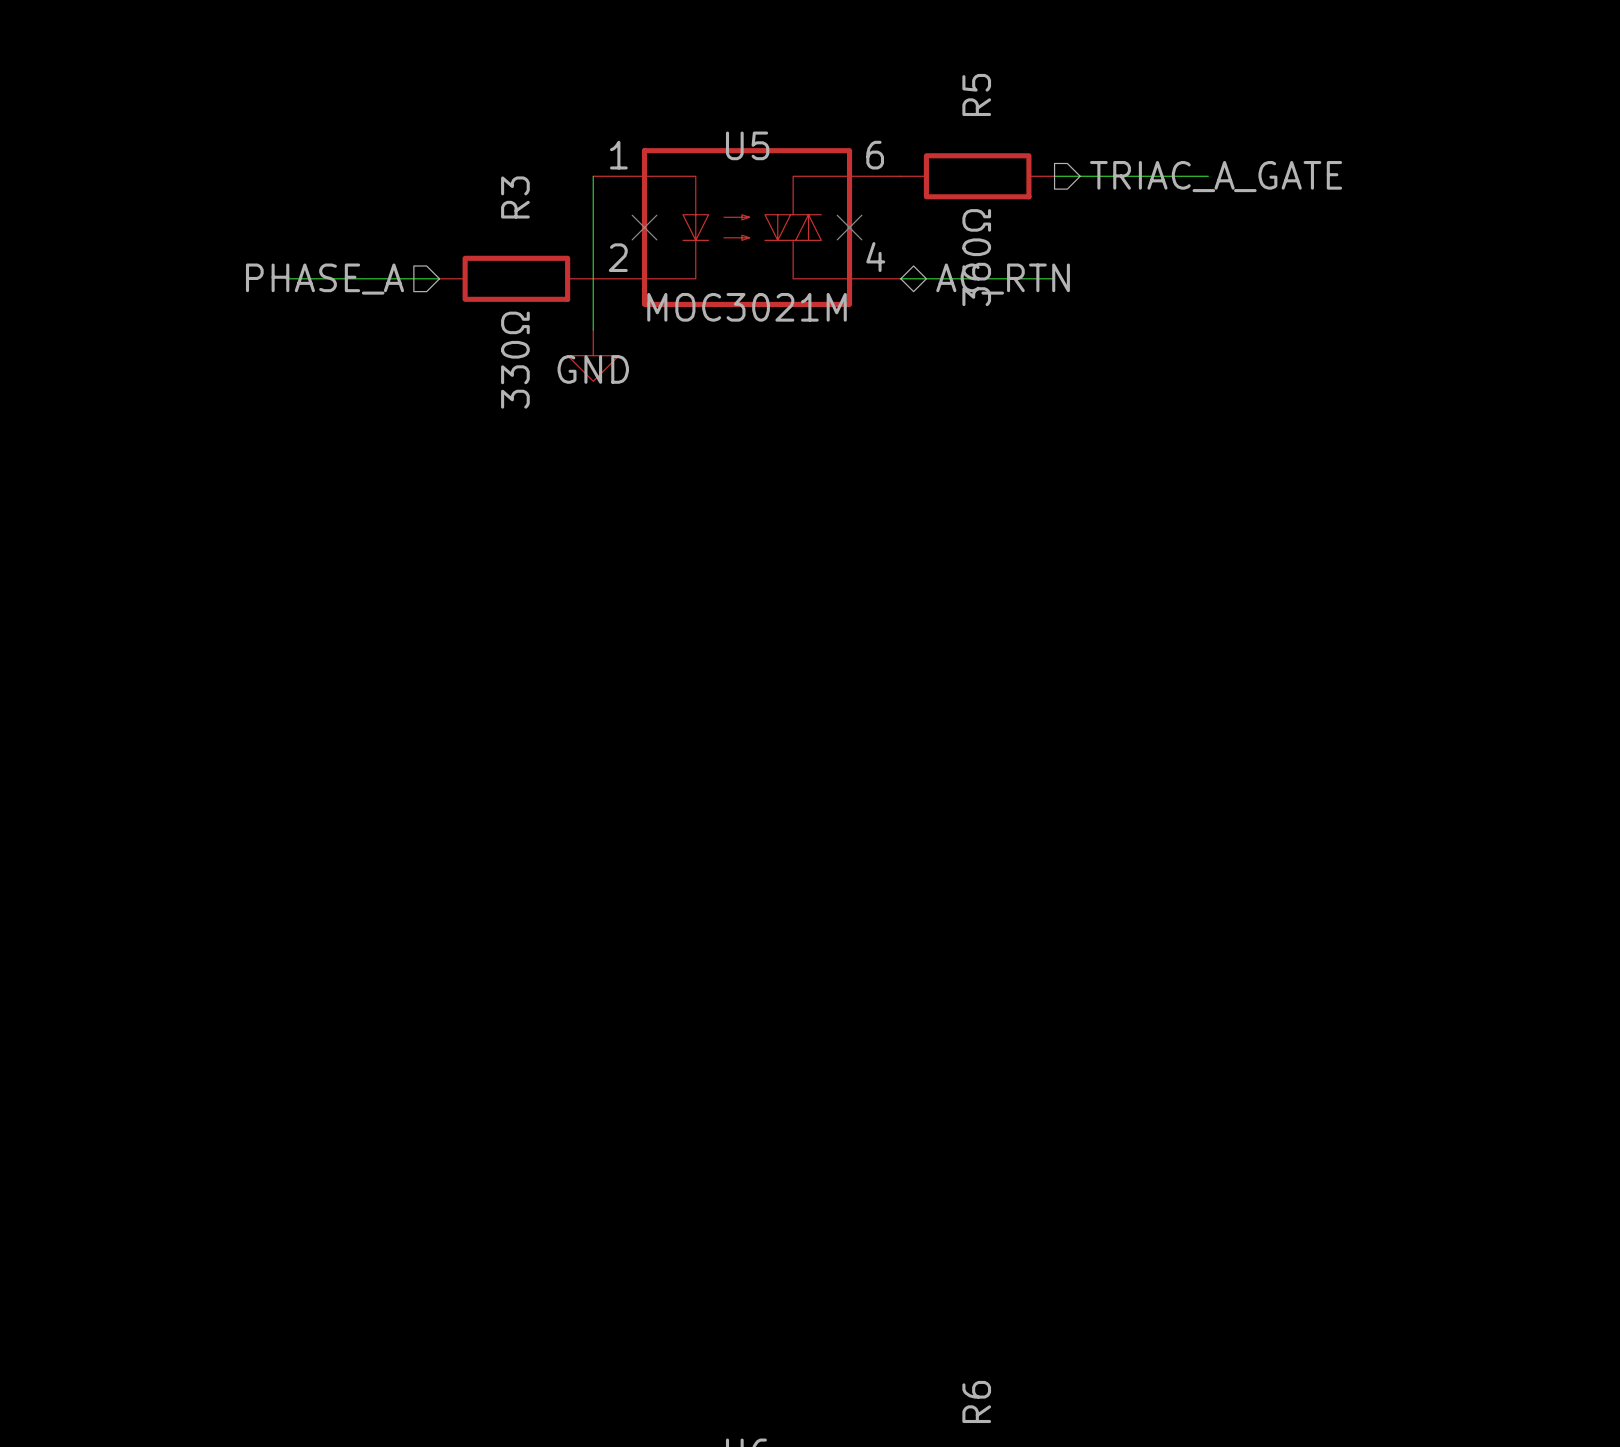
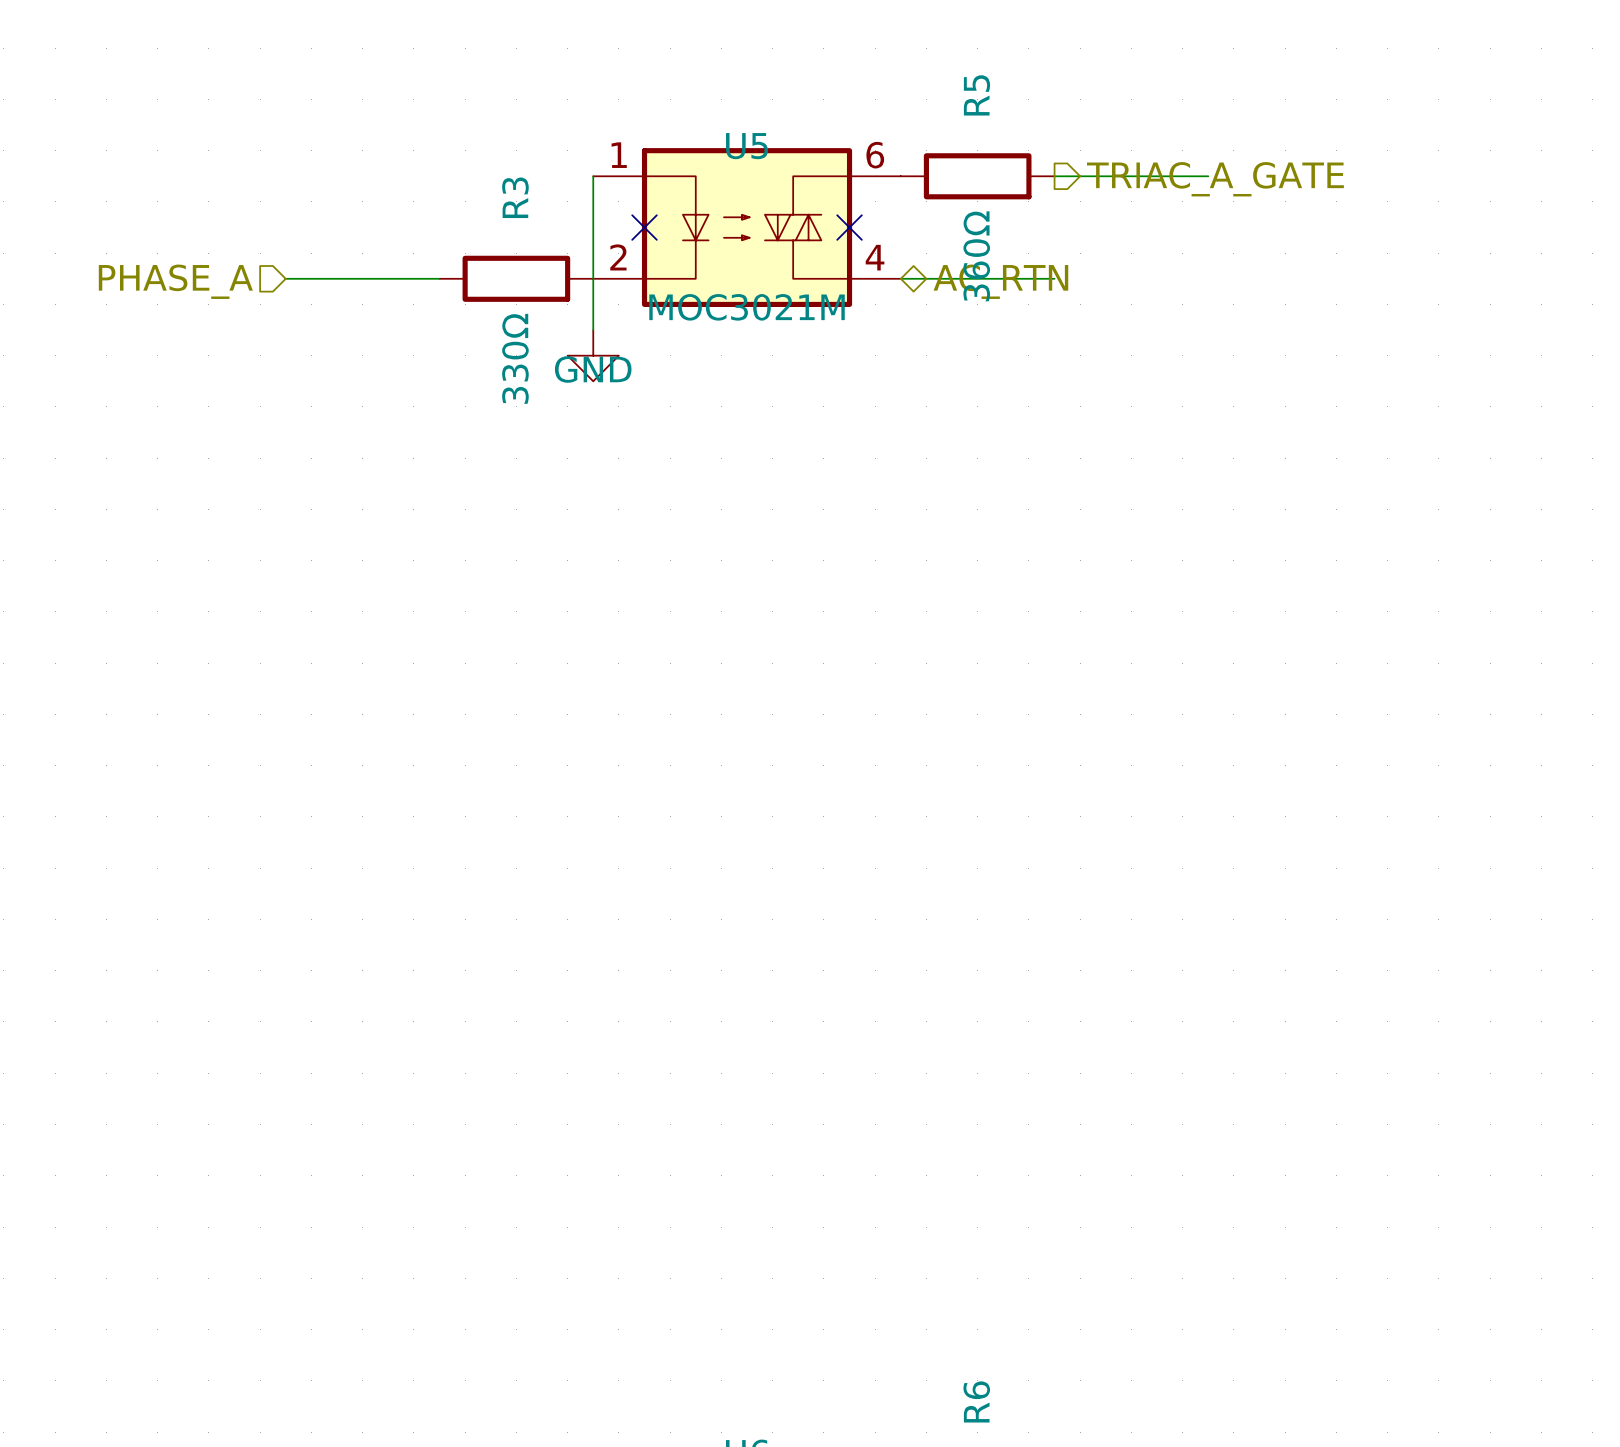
hierarchical label position: PHASE_A (324, 279) -> PHASE_A (175, 281)

